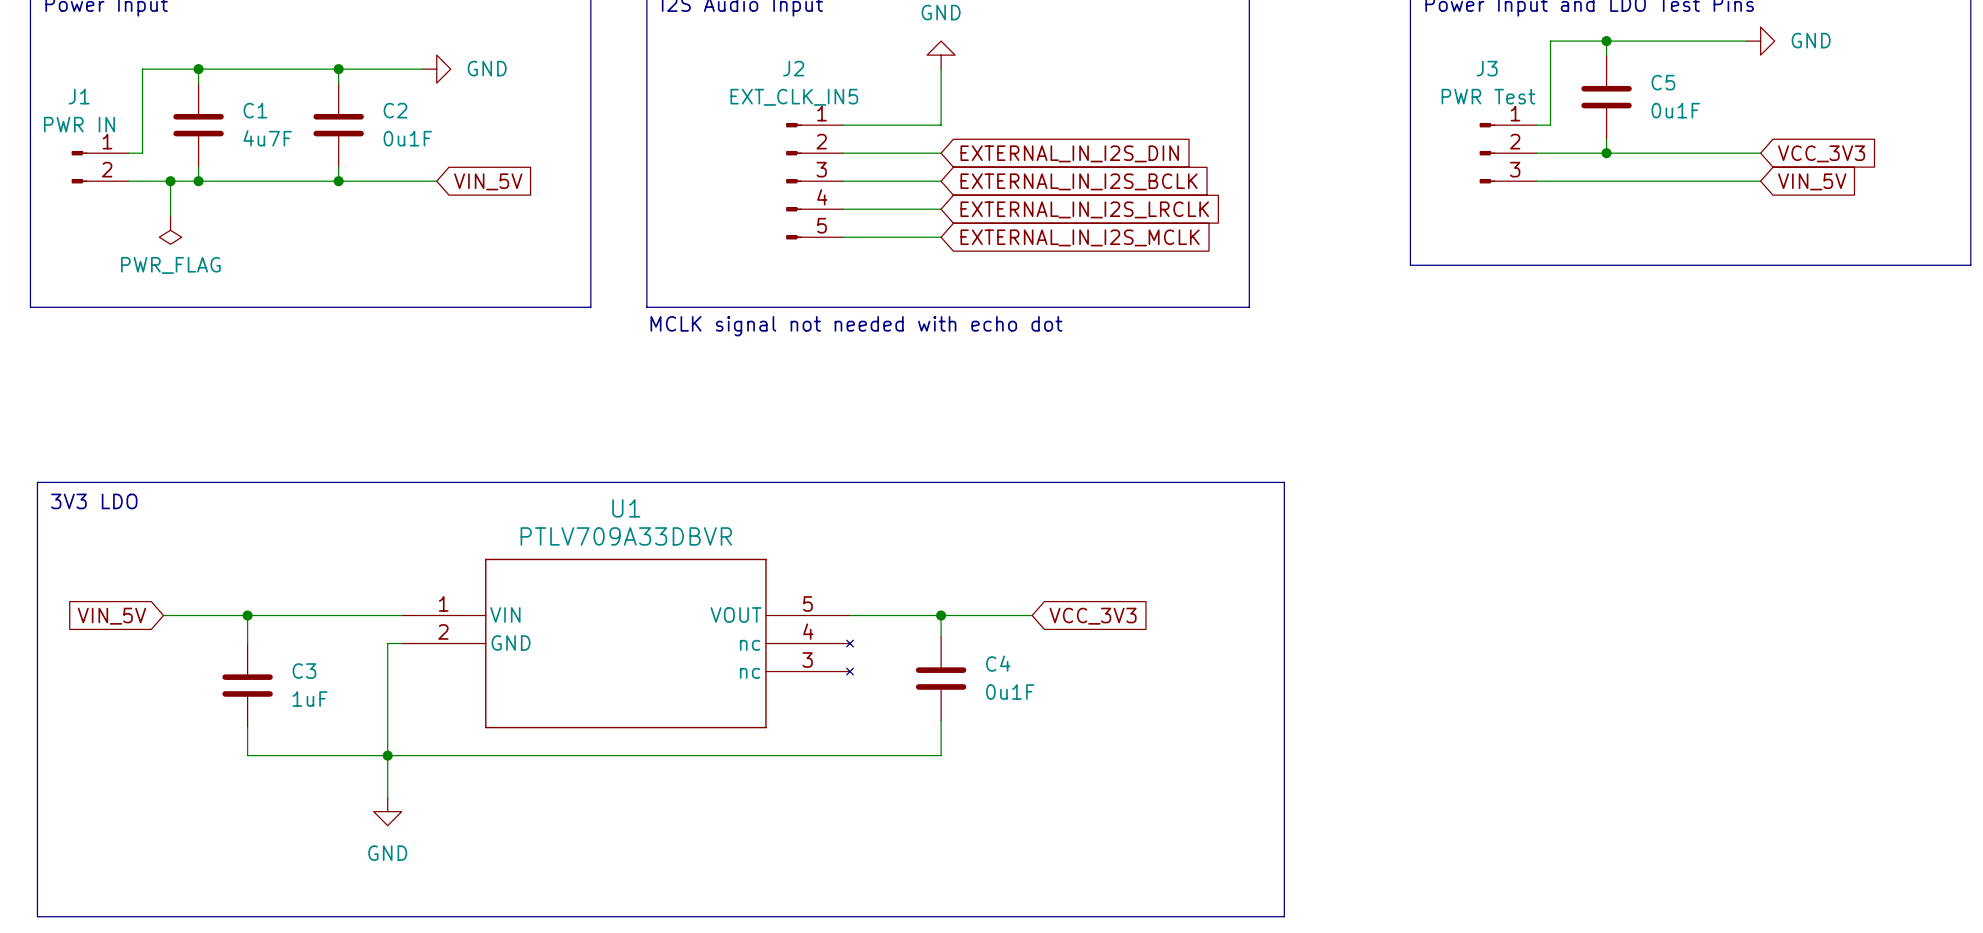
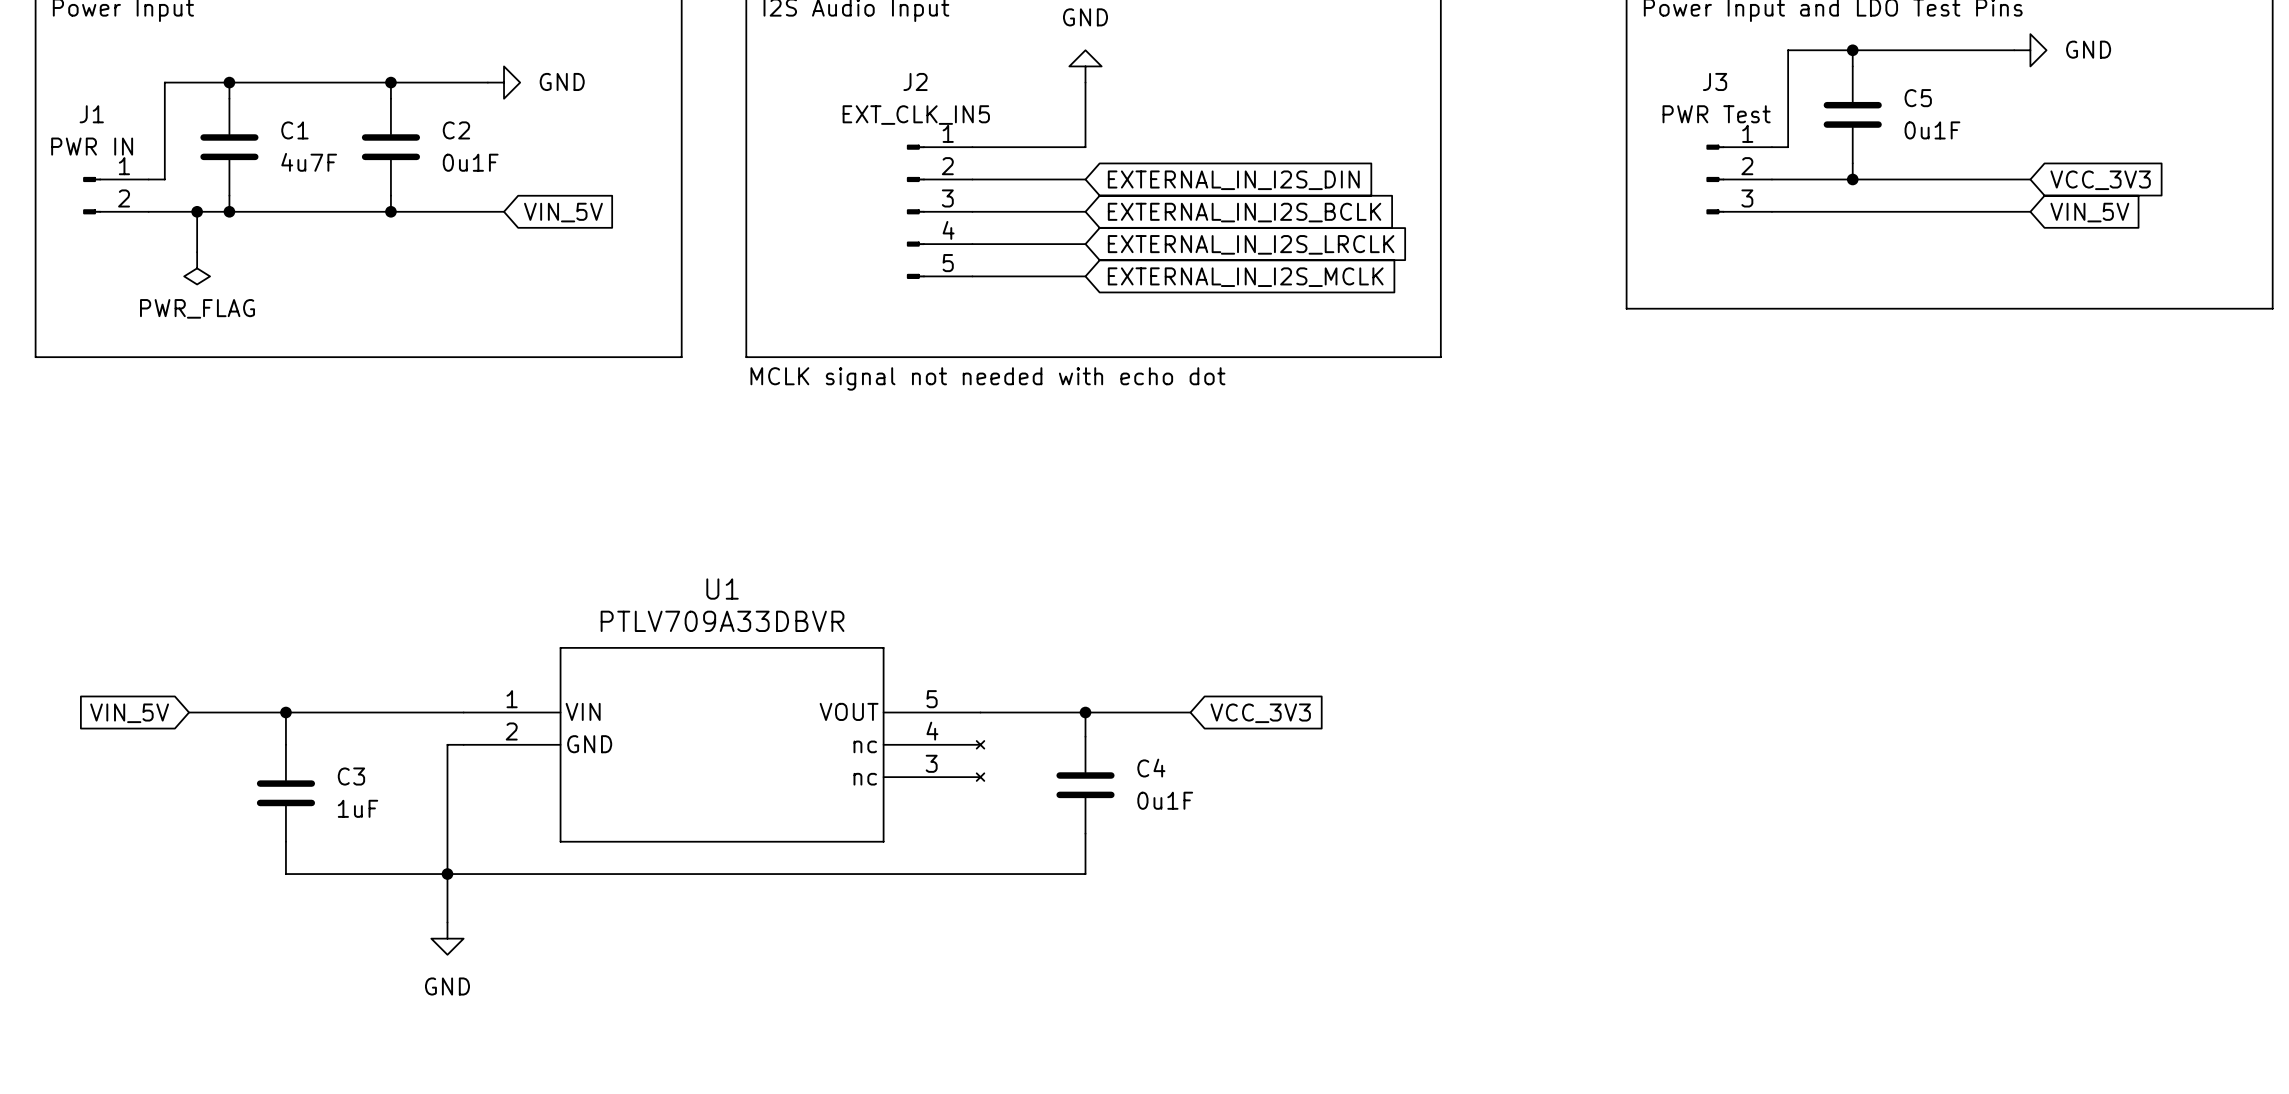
line: (37, 482) (1284, 482) (1284, 916) (37, 916) (37, 482) -> none
text: 3V3 LDO (94, 501) -> none

